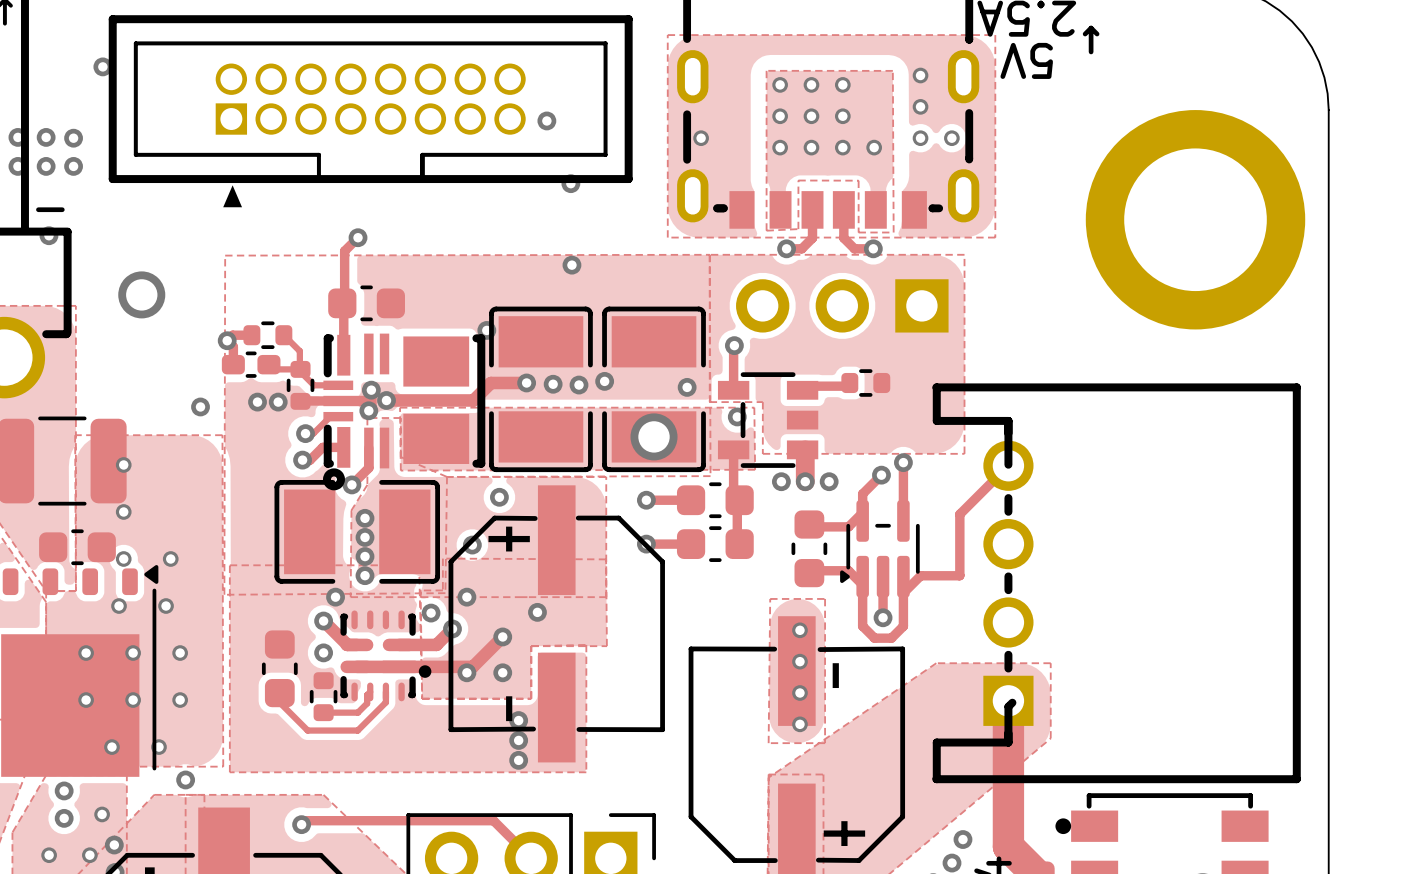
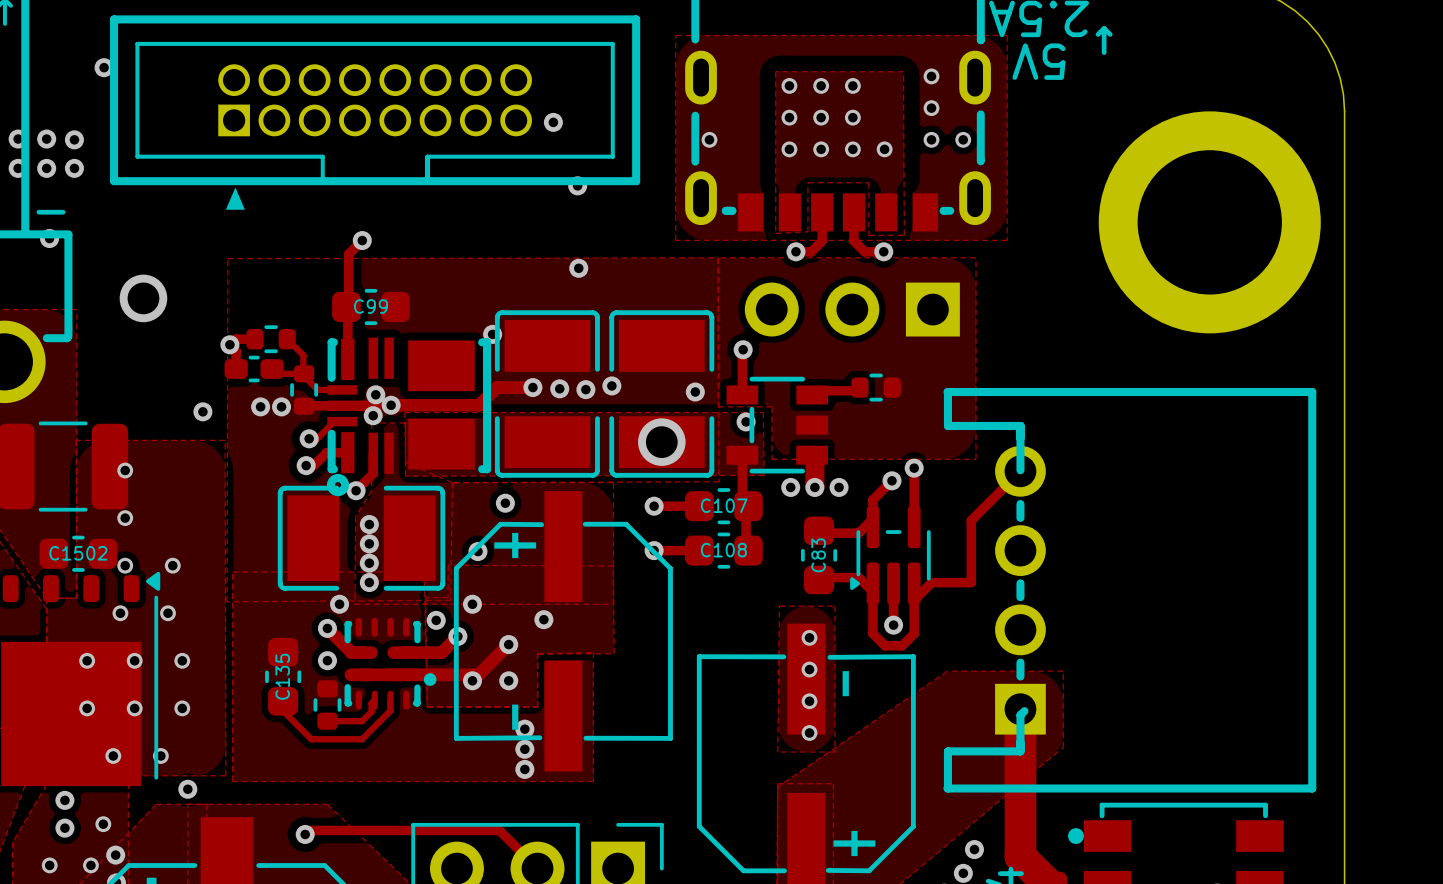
C99 name: none -> C99 (370, 306)
C107 name: none -> C107 (724, 505)
C108 name: none -> C108 (723, 550)
C1502 name: none -> C1502 (78, 553)
C83 name: none -> C83 (818, 555)
C135 name: none -> C135 (282, 676)

